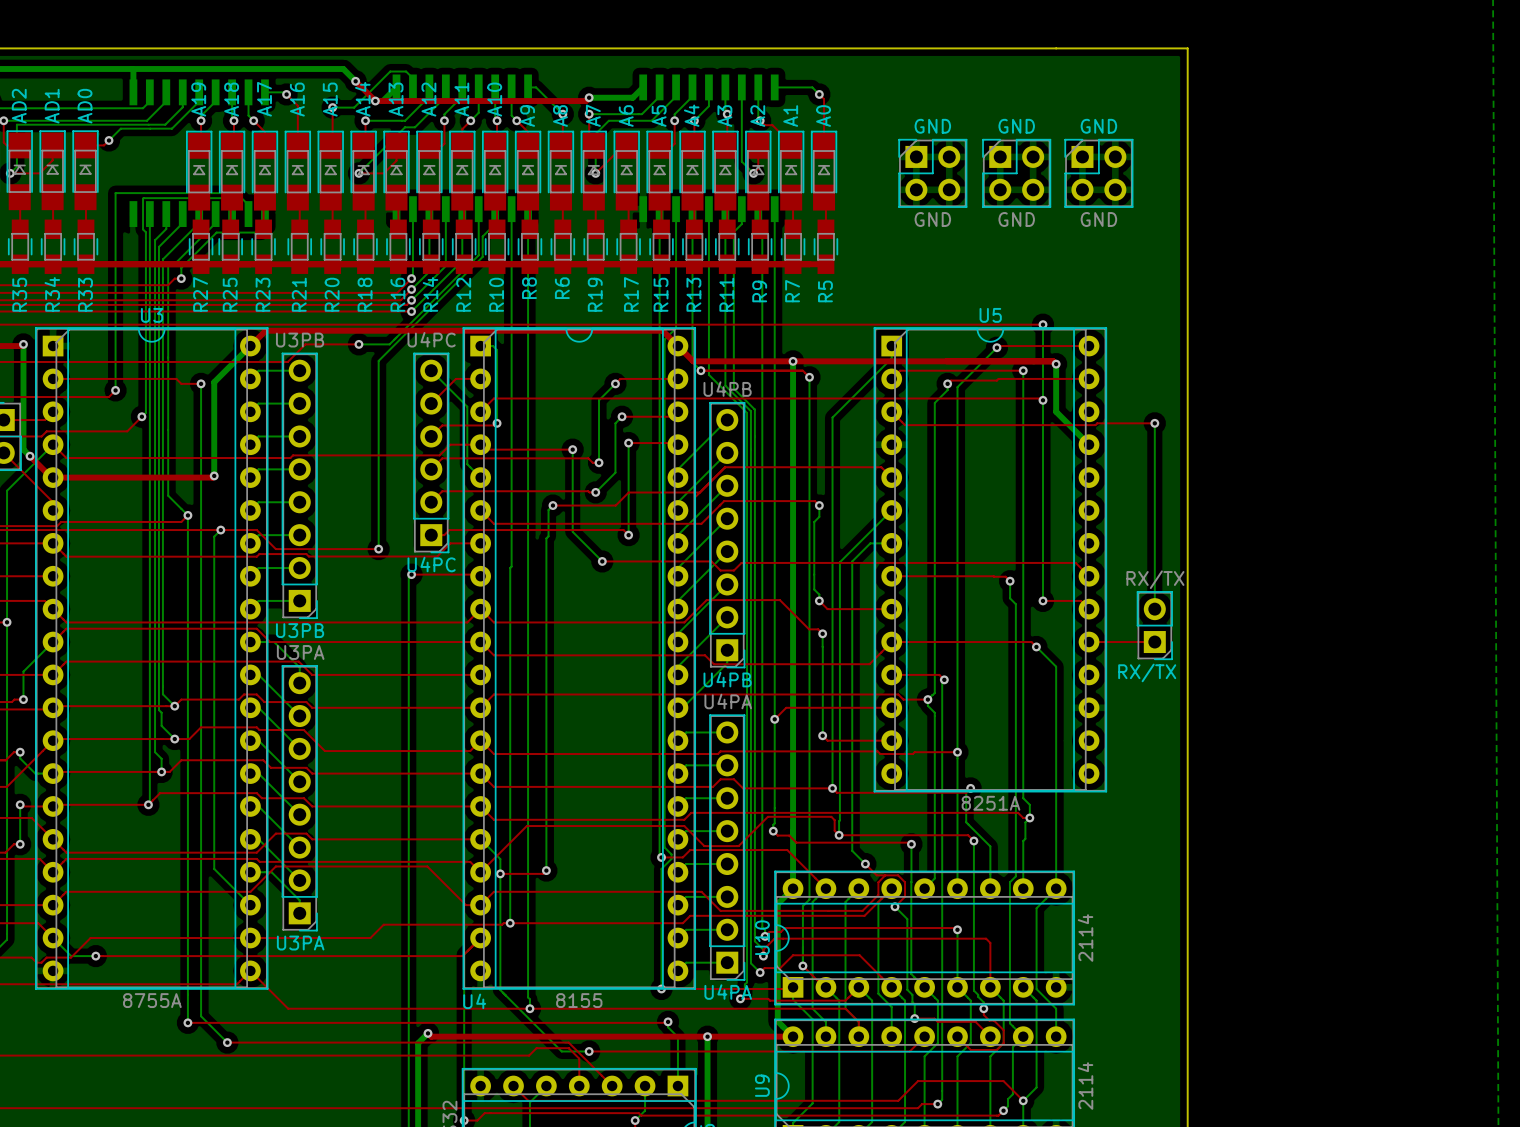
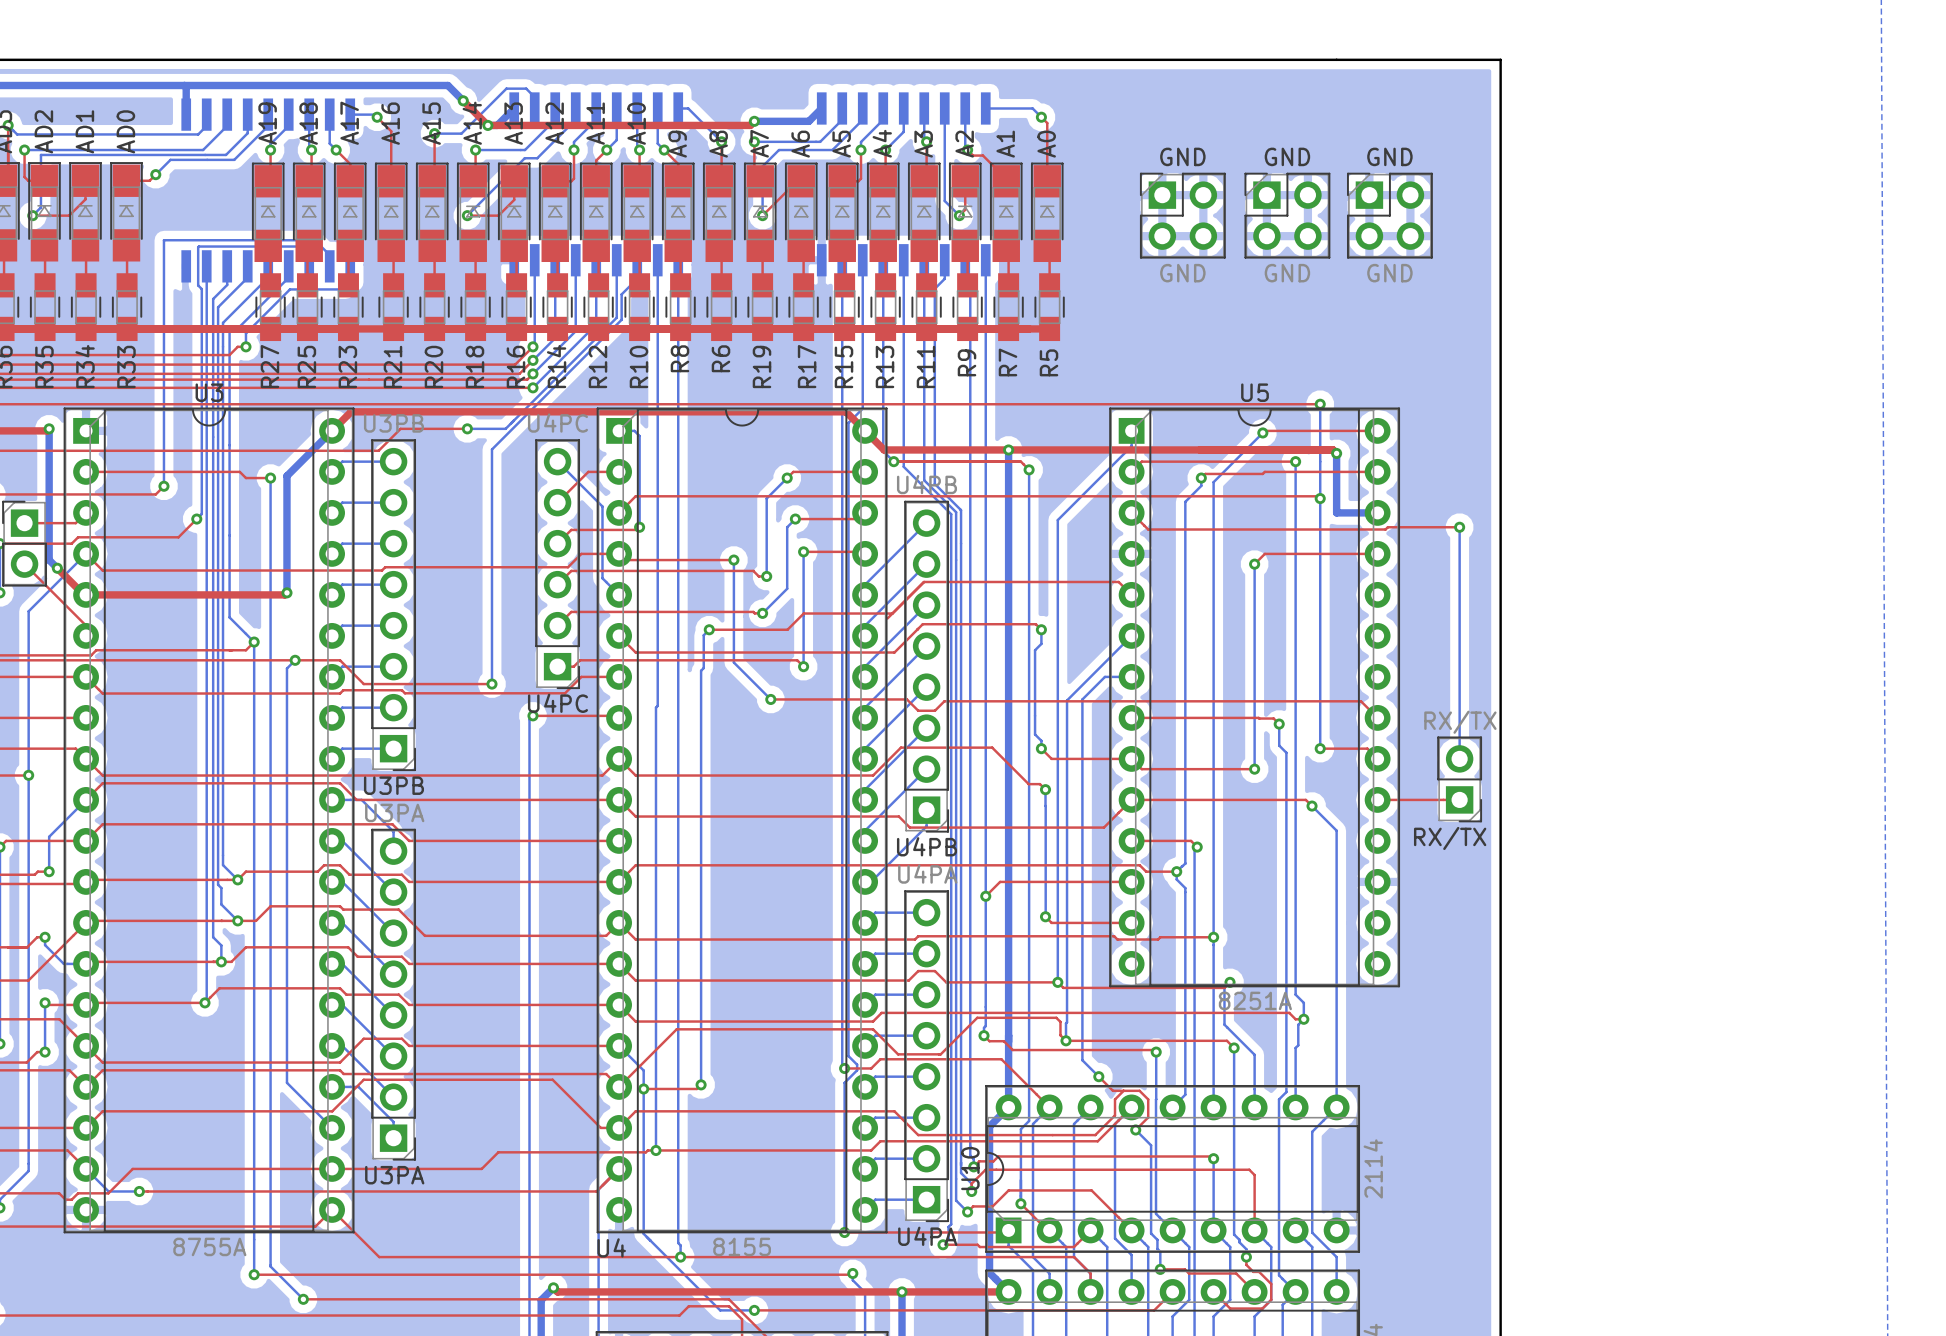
bottom track: (1056, 411) (1089, 444) -> (1336, 512) (1377, 512)
top track: none -> (1377, 553) (1264, 553) (1254, 564)
bottom track: none -> (1254, 564) (1254, 769)
via: none -> (1254, 564)
top track: none -> (1131, 758) (1141, 769) (1254, 769)
via: none -> (1254, 769)

